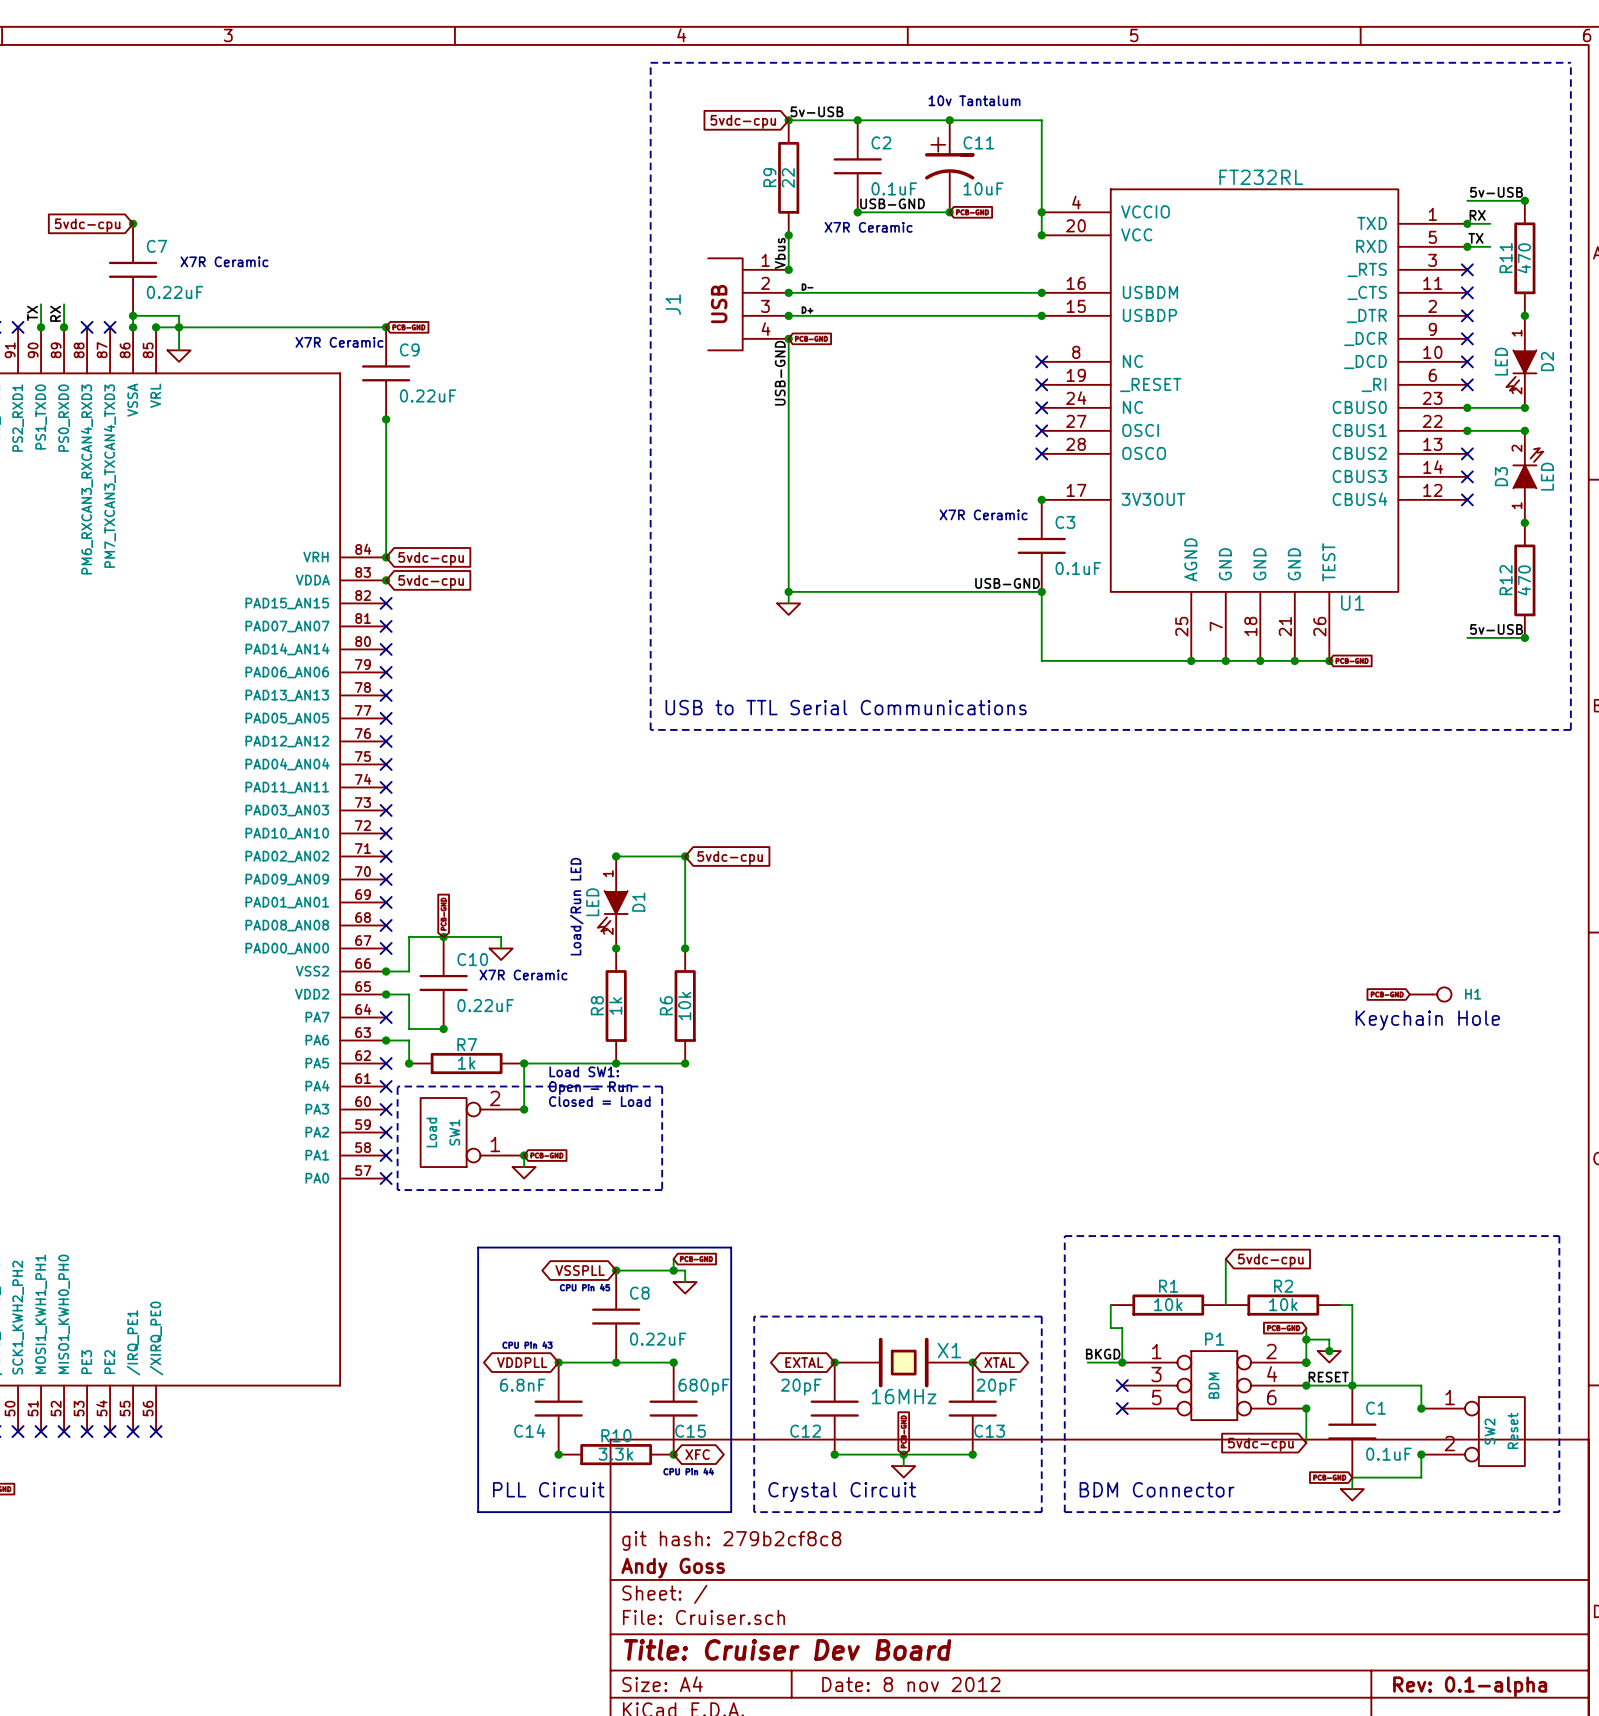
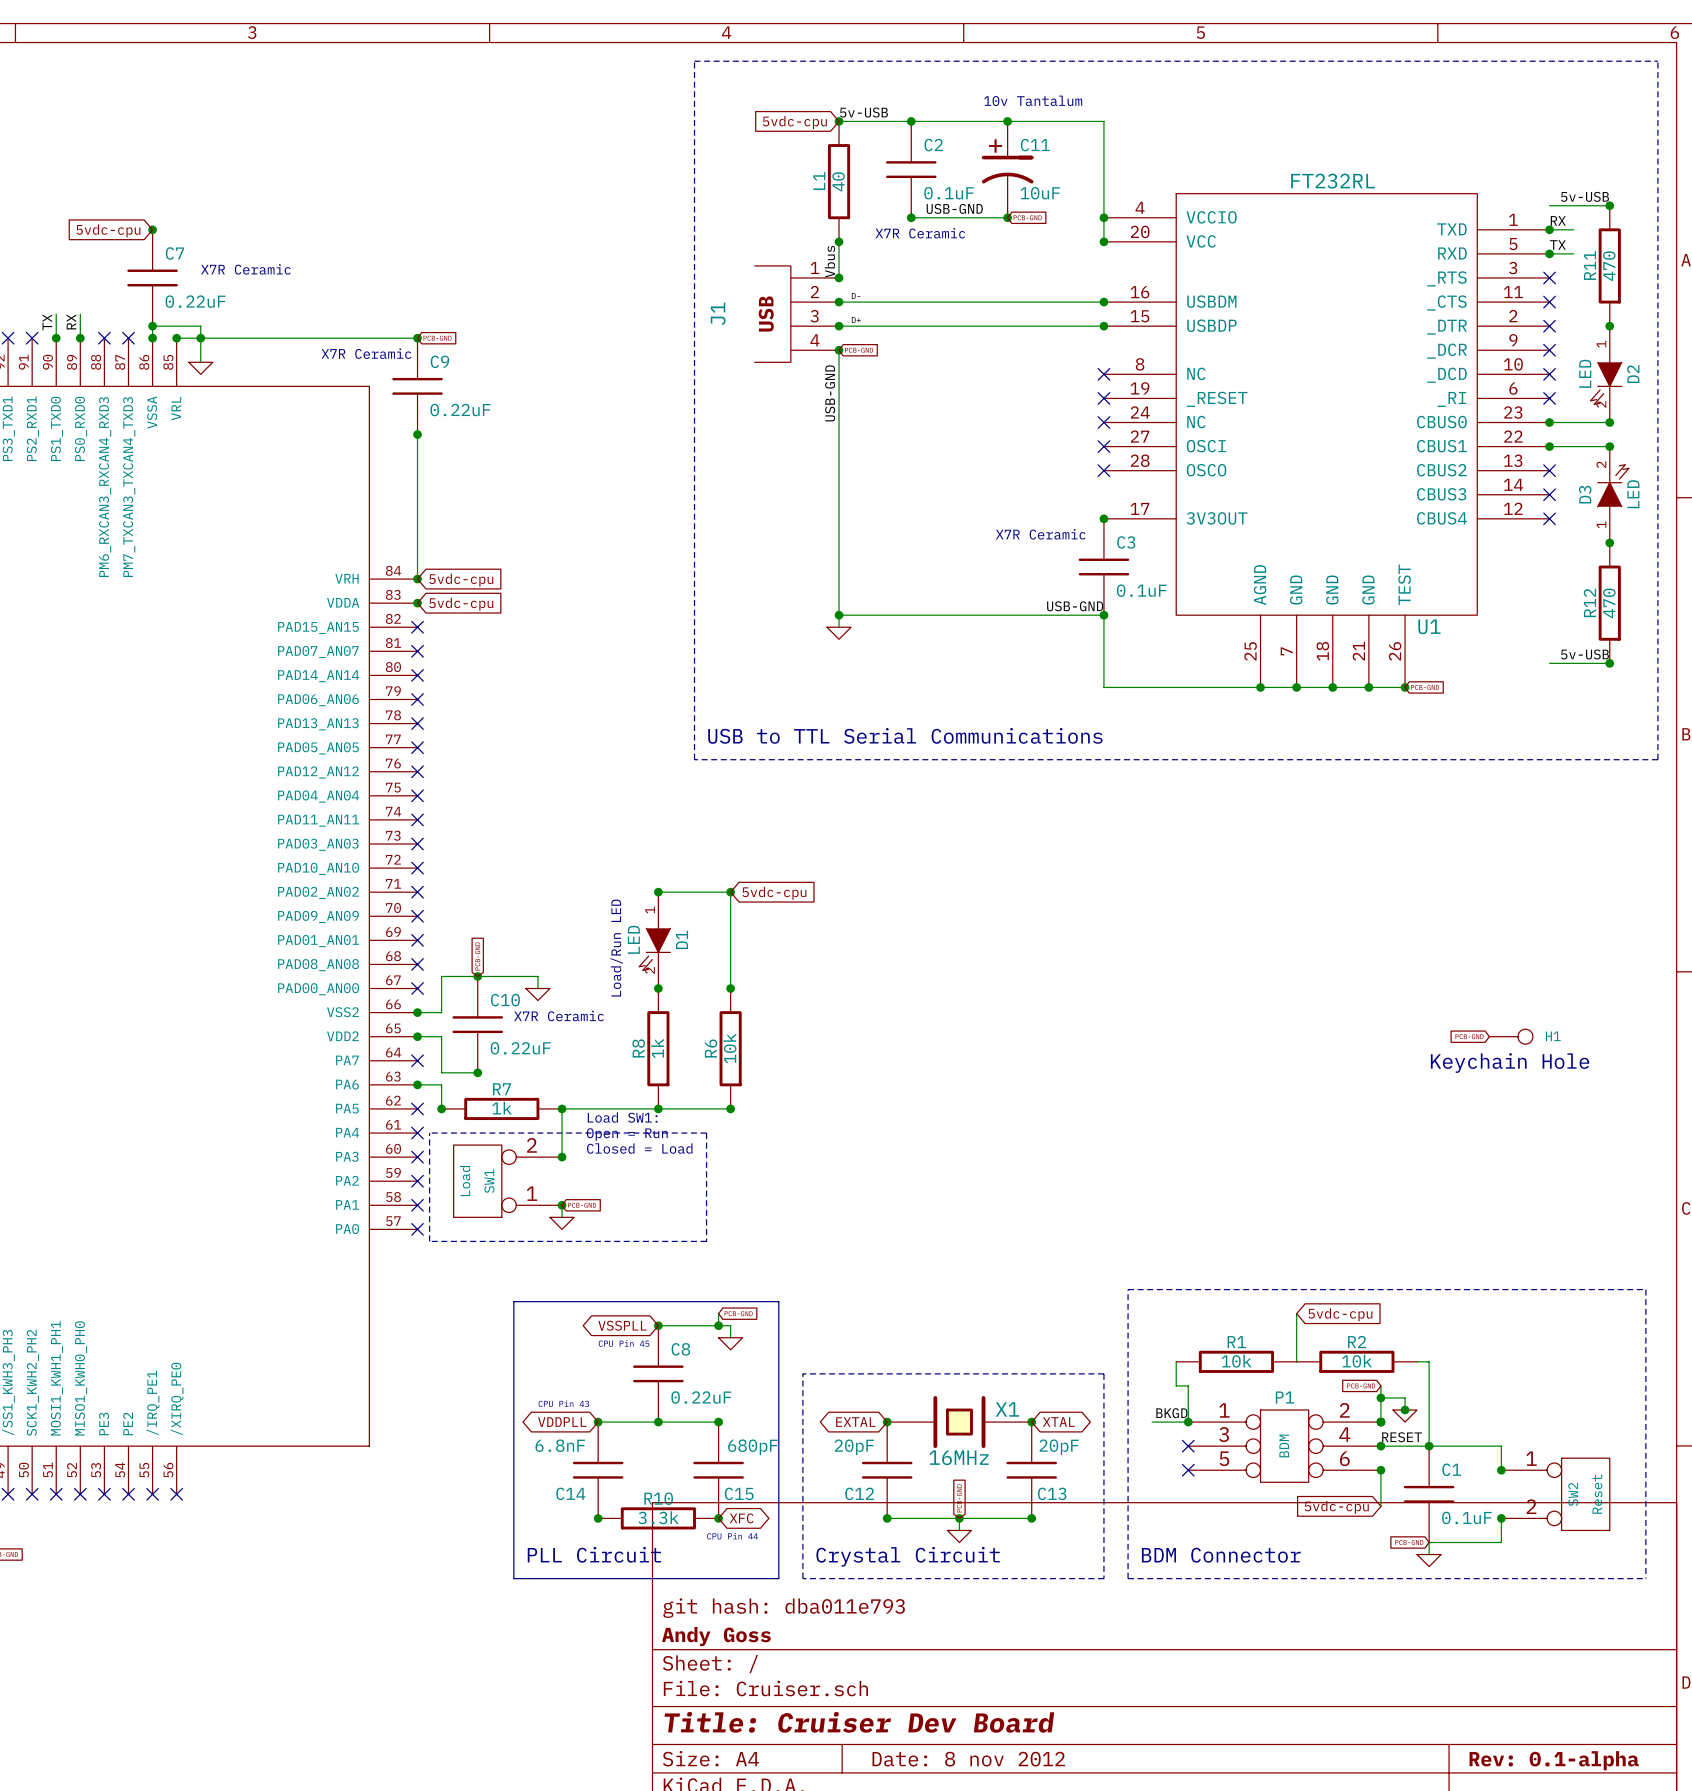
R9 name: R9 (769, 177) -> L1 (819, 181)
R9 value: 22 (788, 178) -> 40 (838, 181)
title block: git hash: 279b2cf8c8 (731, 1540) -> git hash: dba011e793 (784, 1608)

